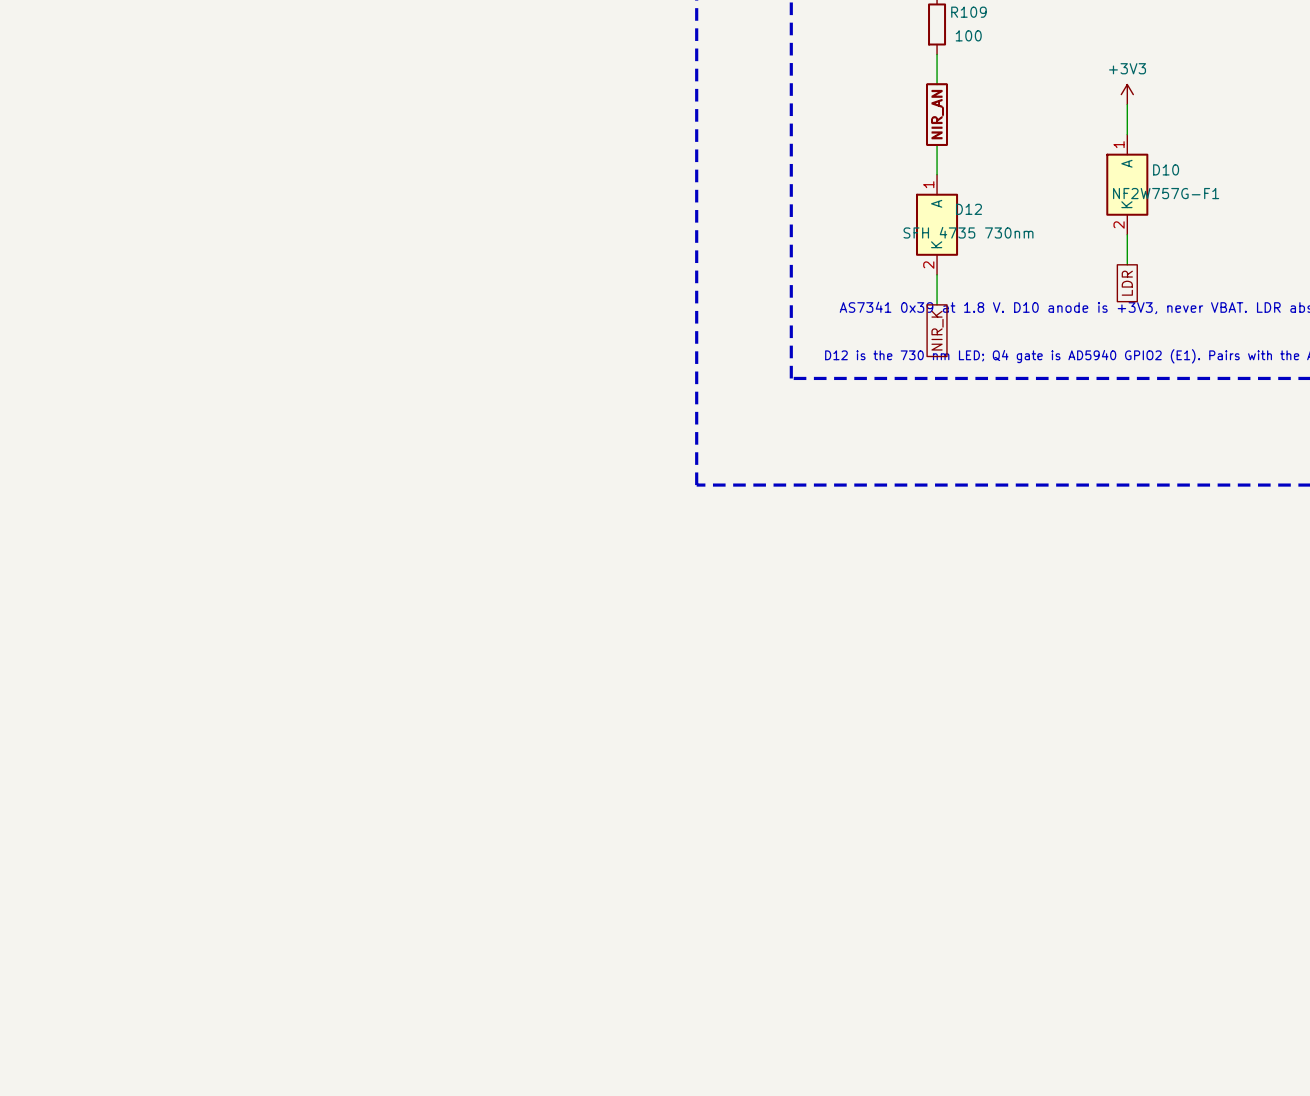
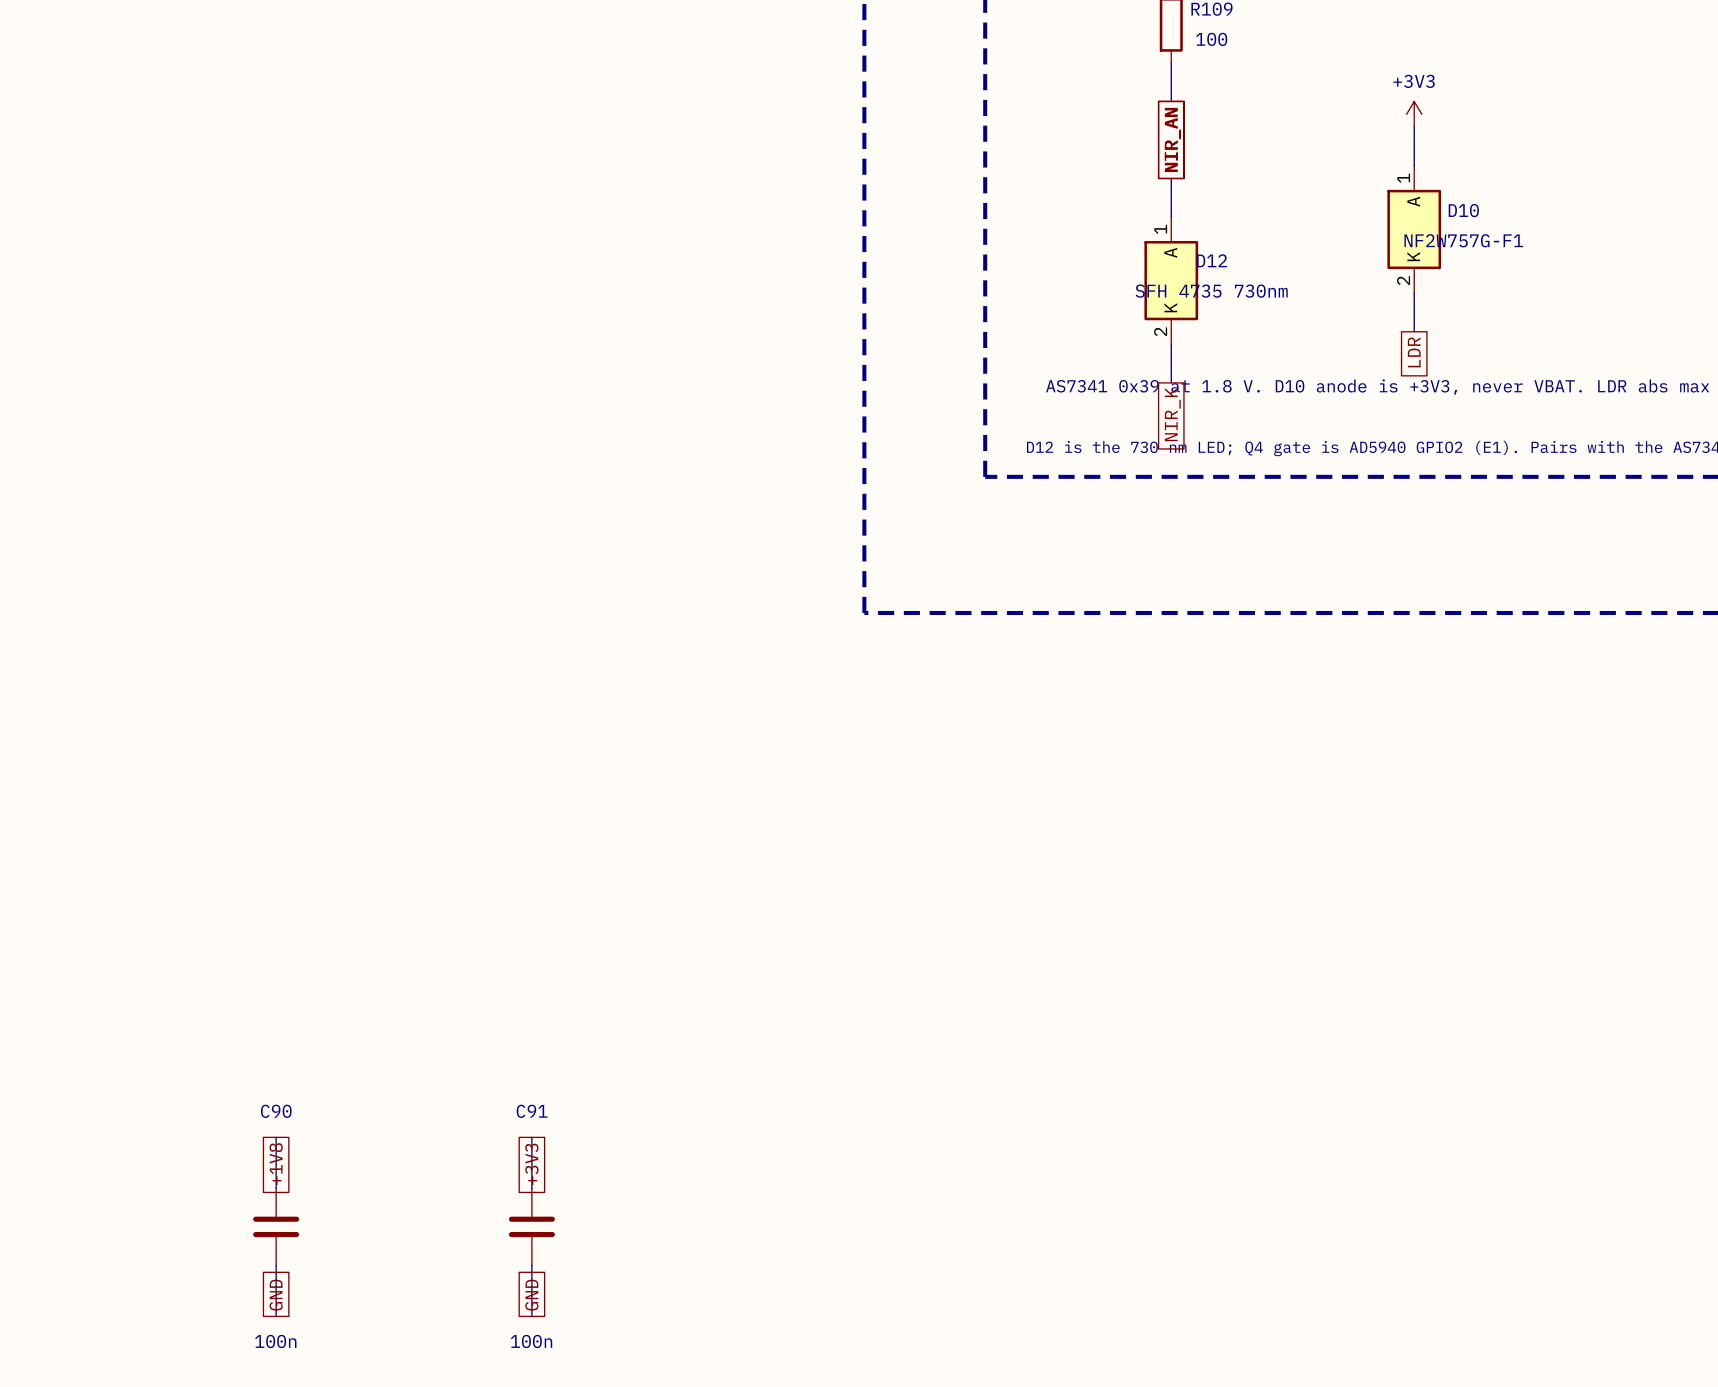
wire: none -> (276, 1137) (276, 1188)
wire: none -> (531, 1137) (531, 1188)
global label: none -> +1V8 (276, 1164)
global label: none -> +3V3 (531, 1164)
C90: none -> 100n (276, 1226)
C91: none -> 100n (531, 1226)
wire: none -> (276, 1265) (276, 1316)
wire: none -> (531, 1265) (531, 1316)
global label: none -> GND (276, 1295)
global label: none -> GND (531, 1295)

